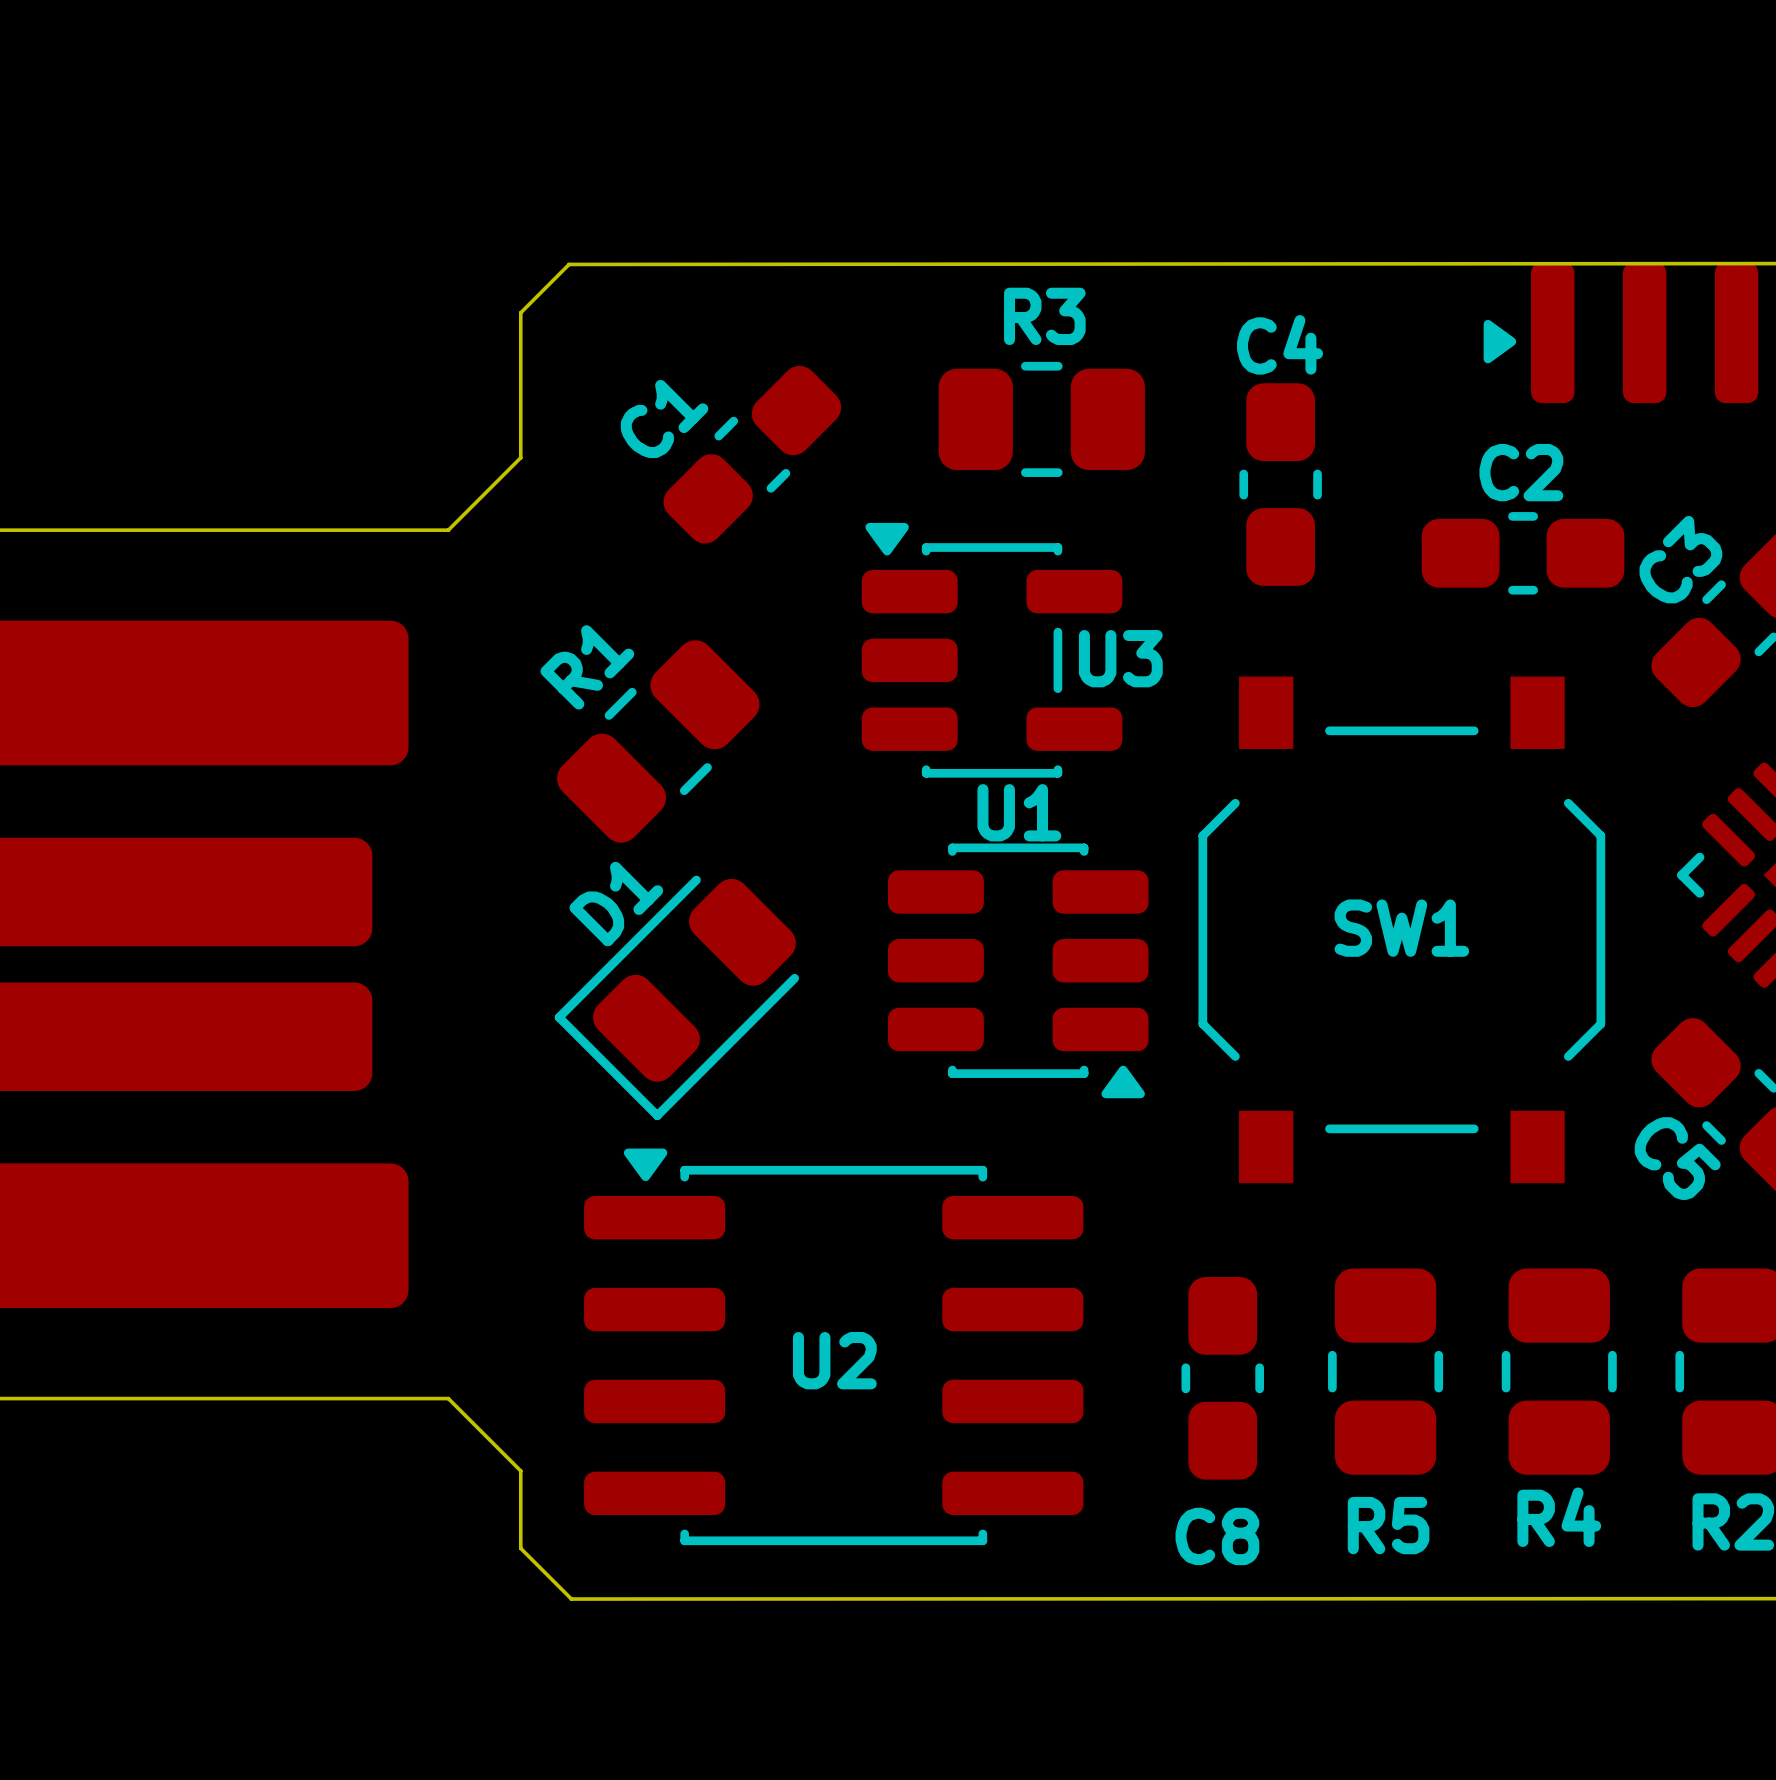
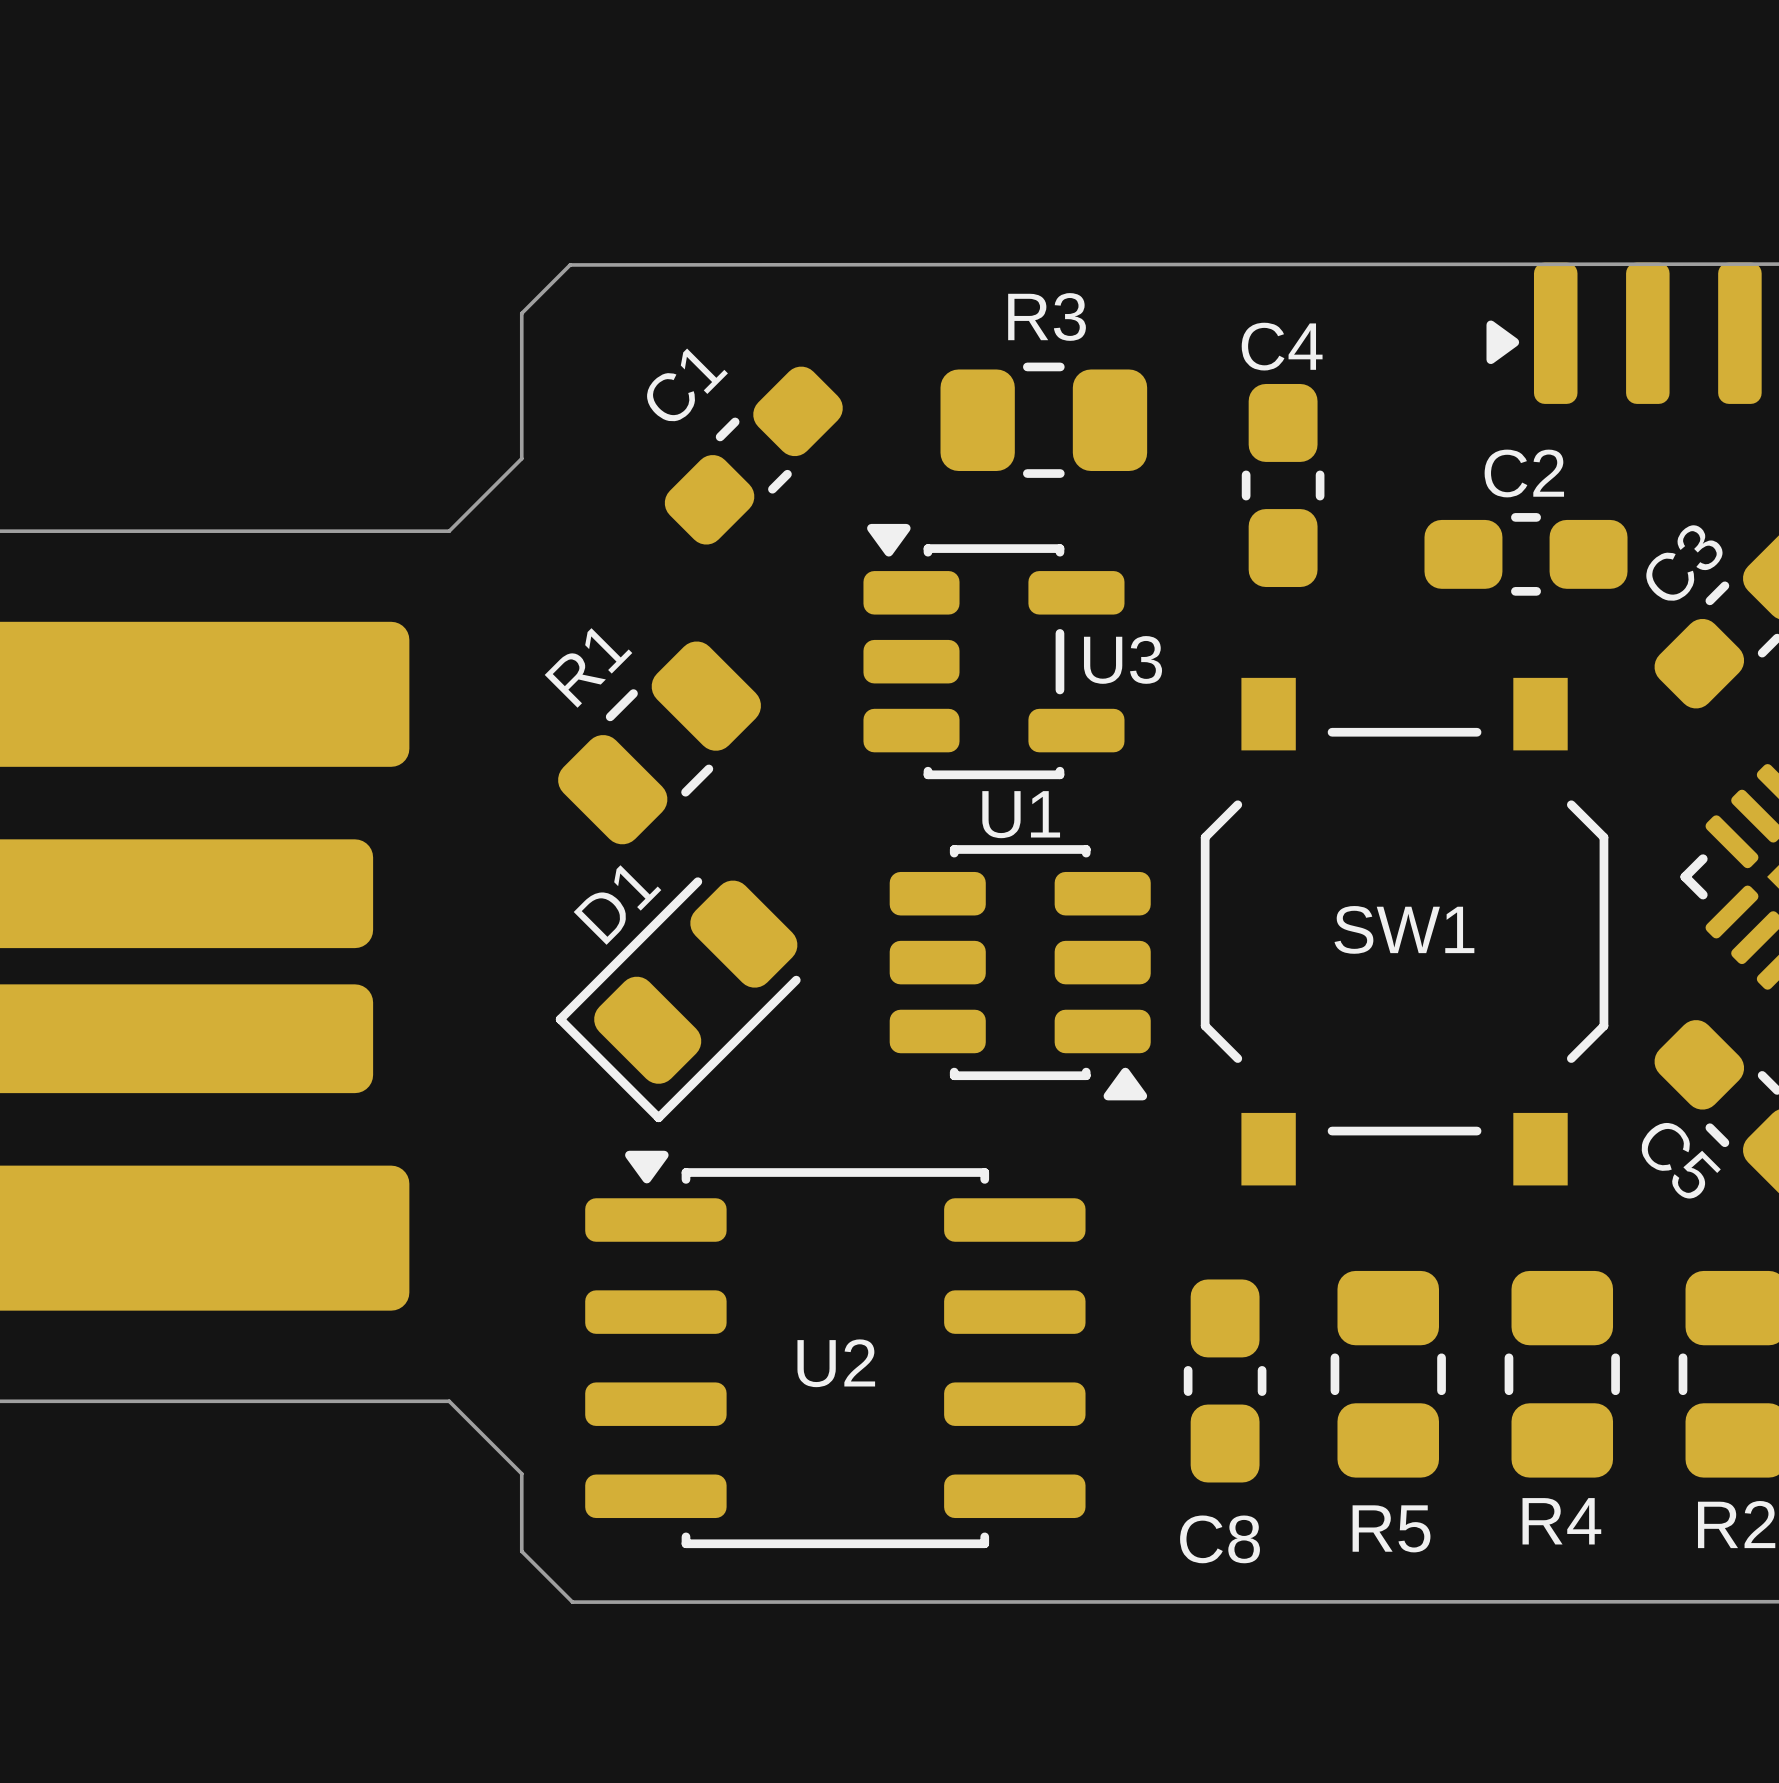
C1 name position: C1 (664, 418) -> C1 (687, 385)

